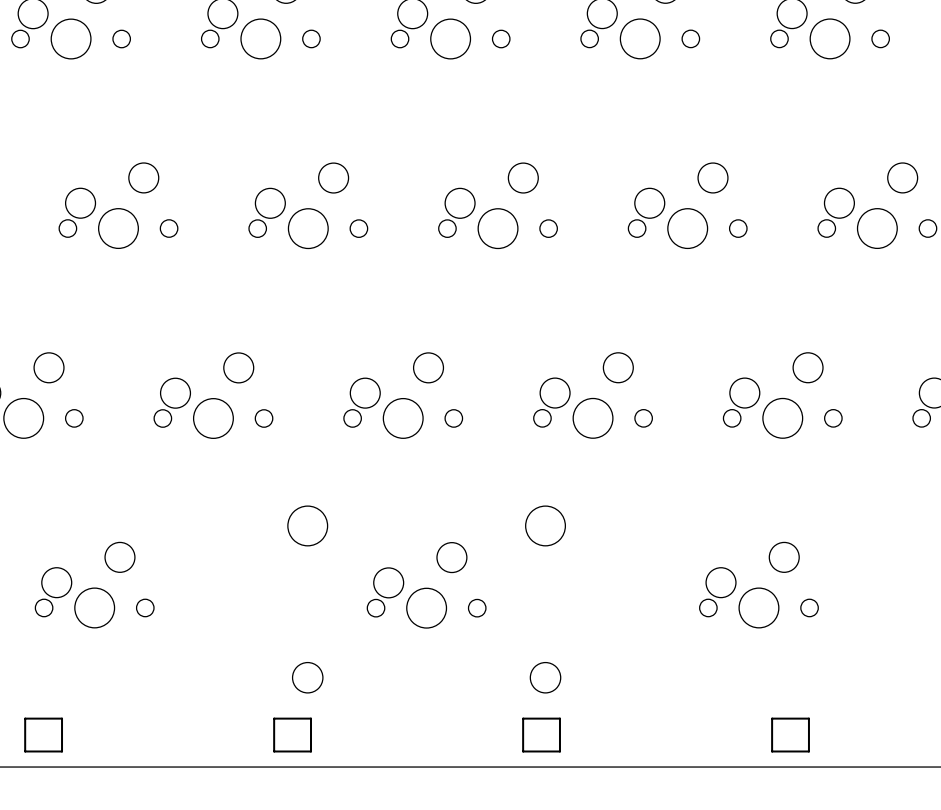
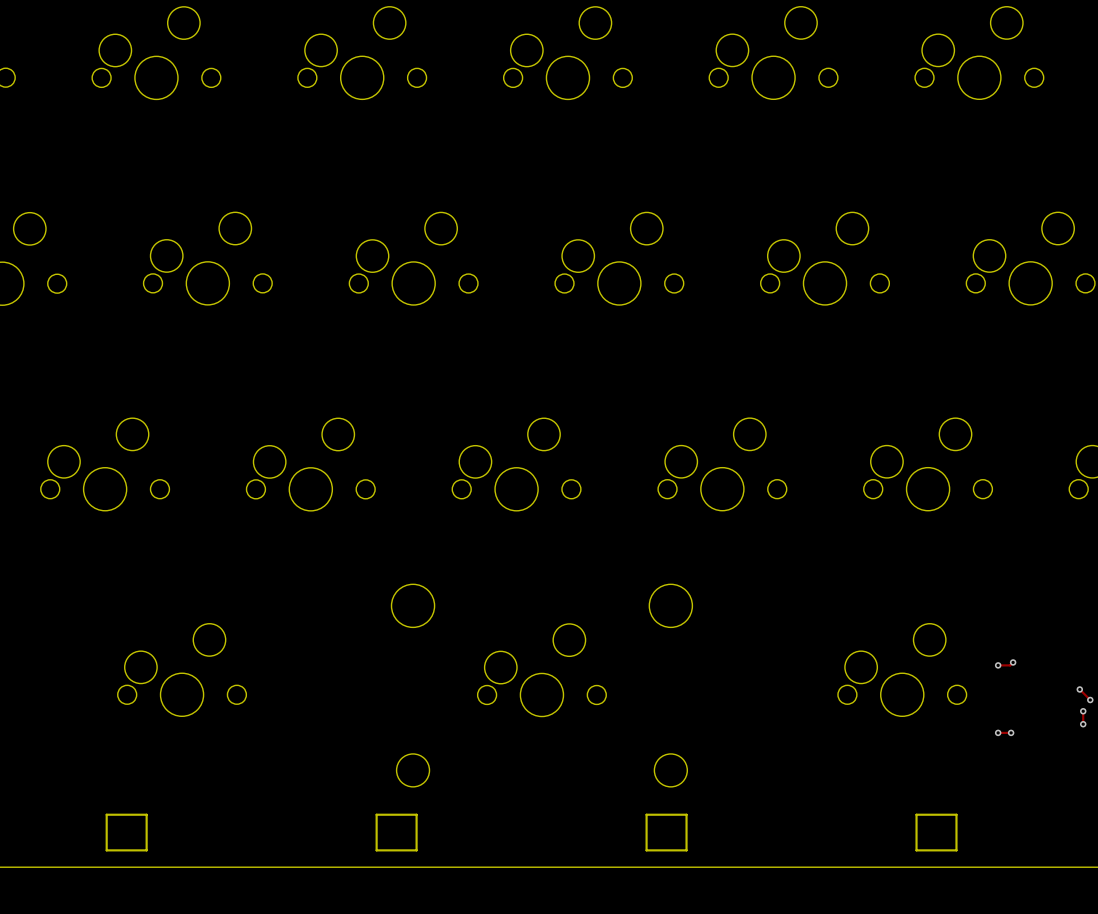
track: none -> (1013, 662) (1010, 665) (998, 665)
via: none -> (1013, 662)
via: none -> (998, 665)
track: none -> (1079, 689) (1090, 699)
via: none -> (1079, 689)
via: none -> (1090, 700)
track: none -> (1083, 711) (1083, 724)
via: none -> (1083, 711)
via: none -> (1083, 724)
track: none -> (998, 732) (1011, 732)
via: none -> (998, 732)
via: none -> (1011, 732)

